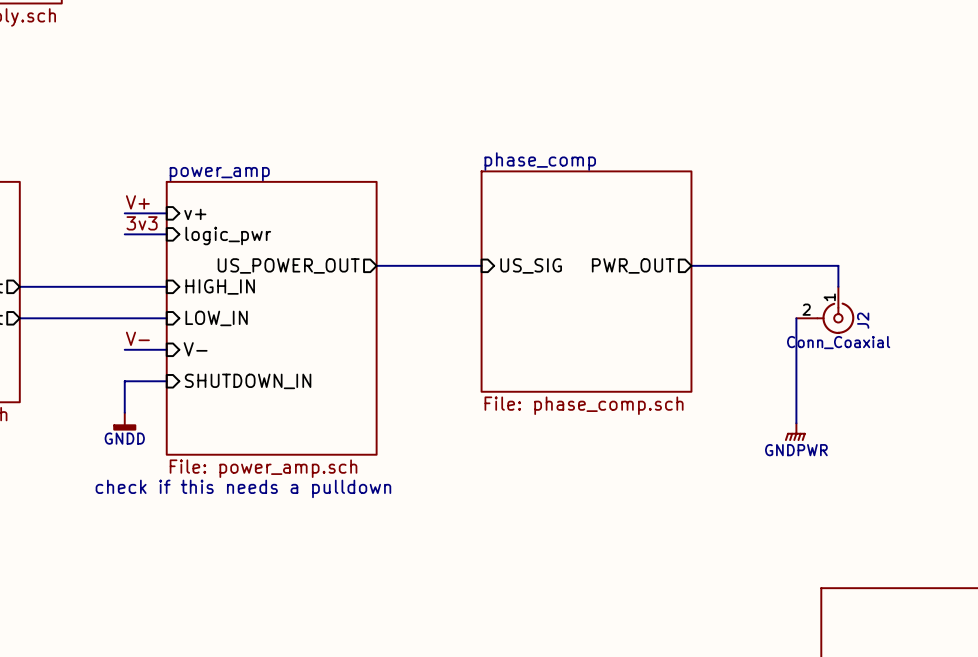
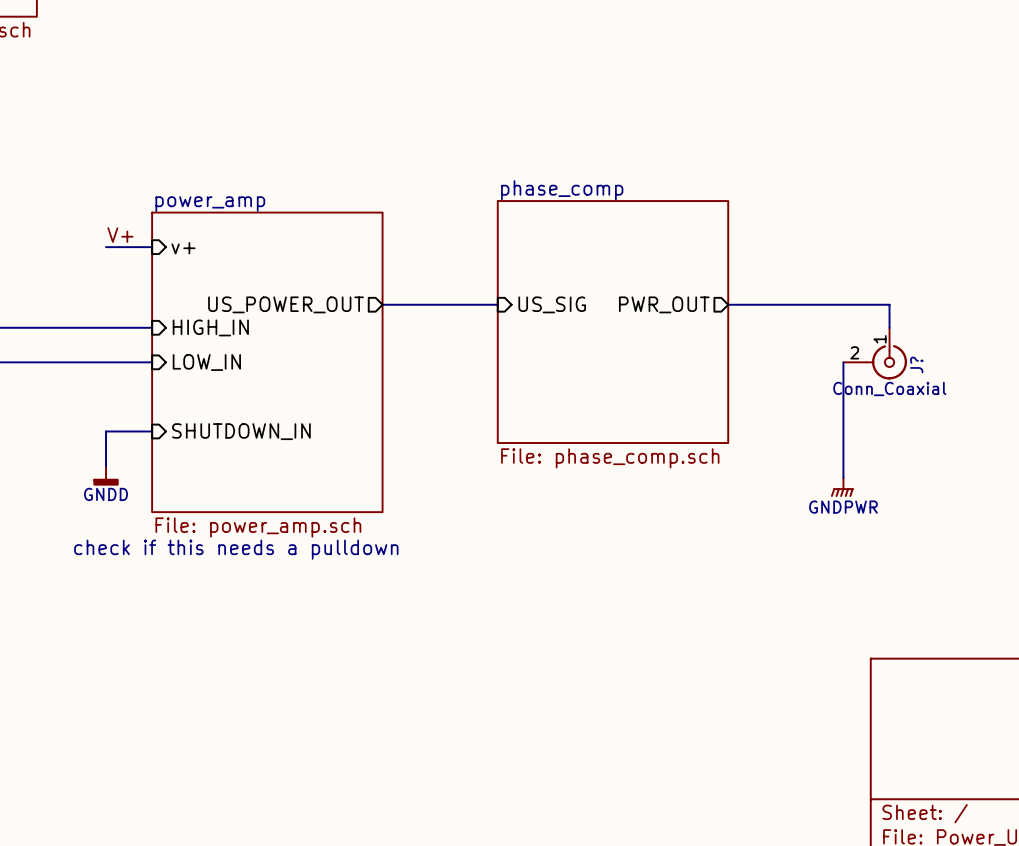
label: 3v3 (142, 223) -> none
wire: (124, 234) (166, 234) -> none
sheet pin: logic_pwr (228, 235) -> none
J2 name: J2 (863, 320) -> J? (916, 364)
label: V- (137, 338) -> none
wire: (124, 349) (166, 349) -> none
sheet pin: V- (195, 349) -> none

